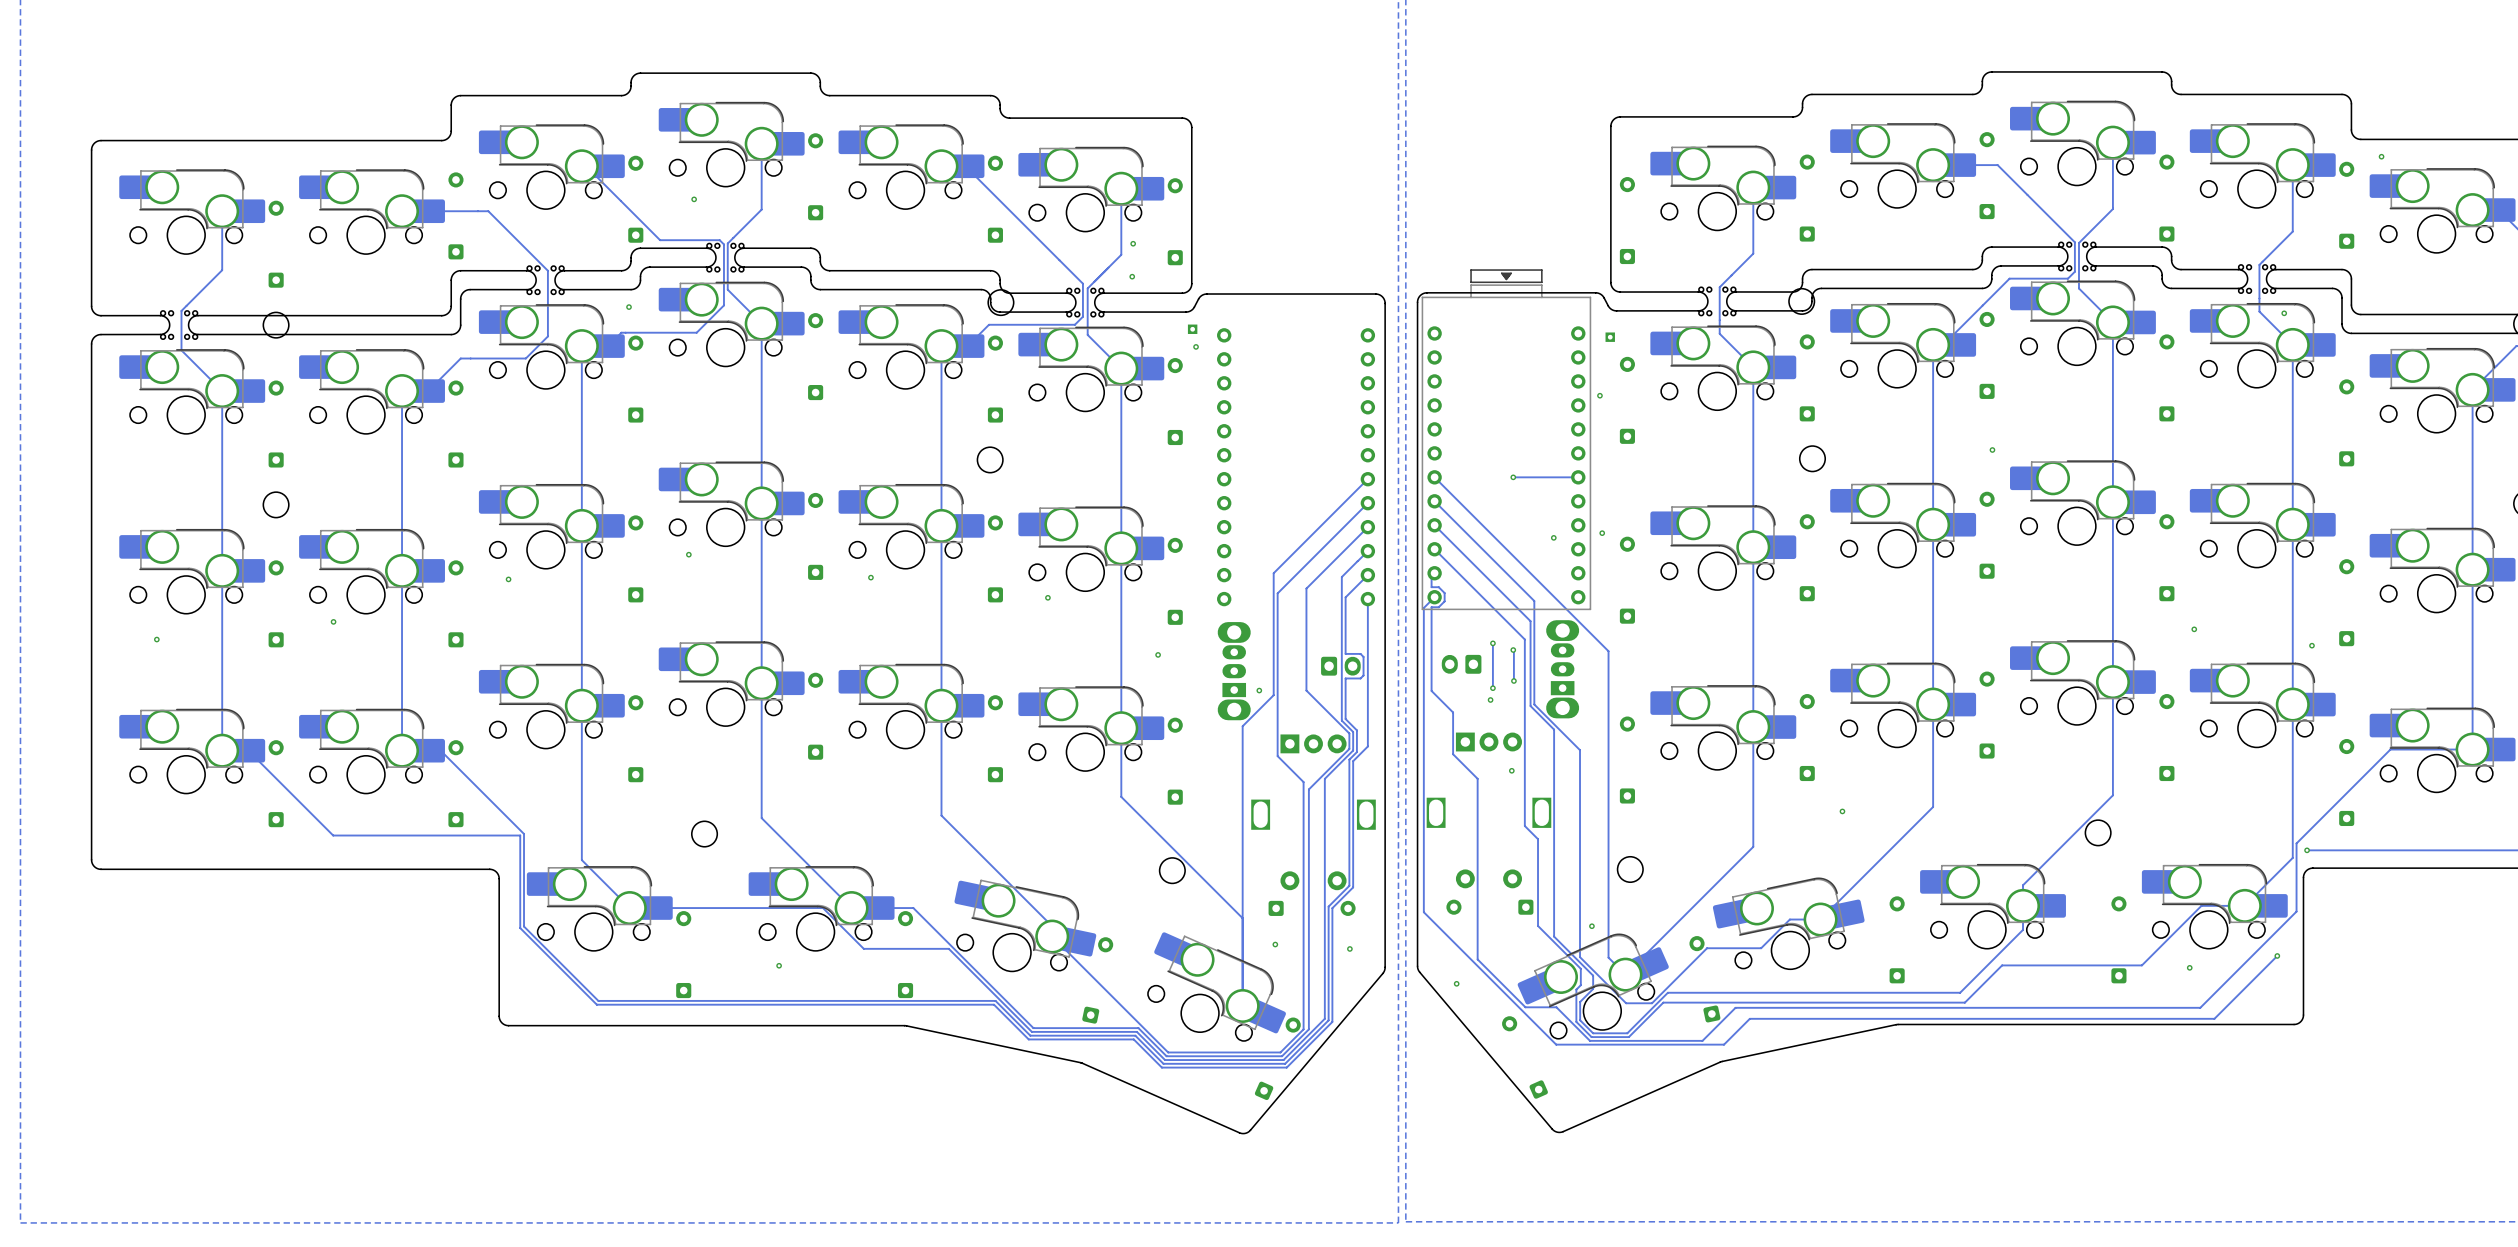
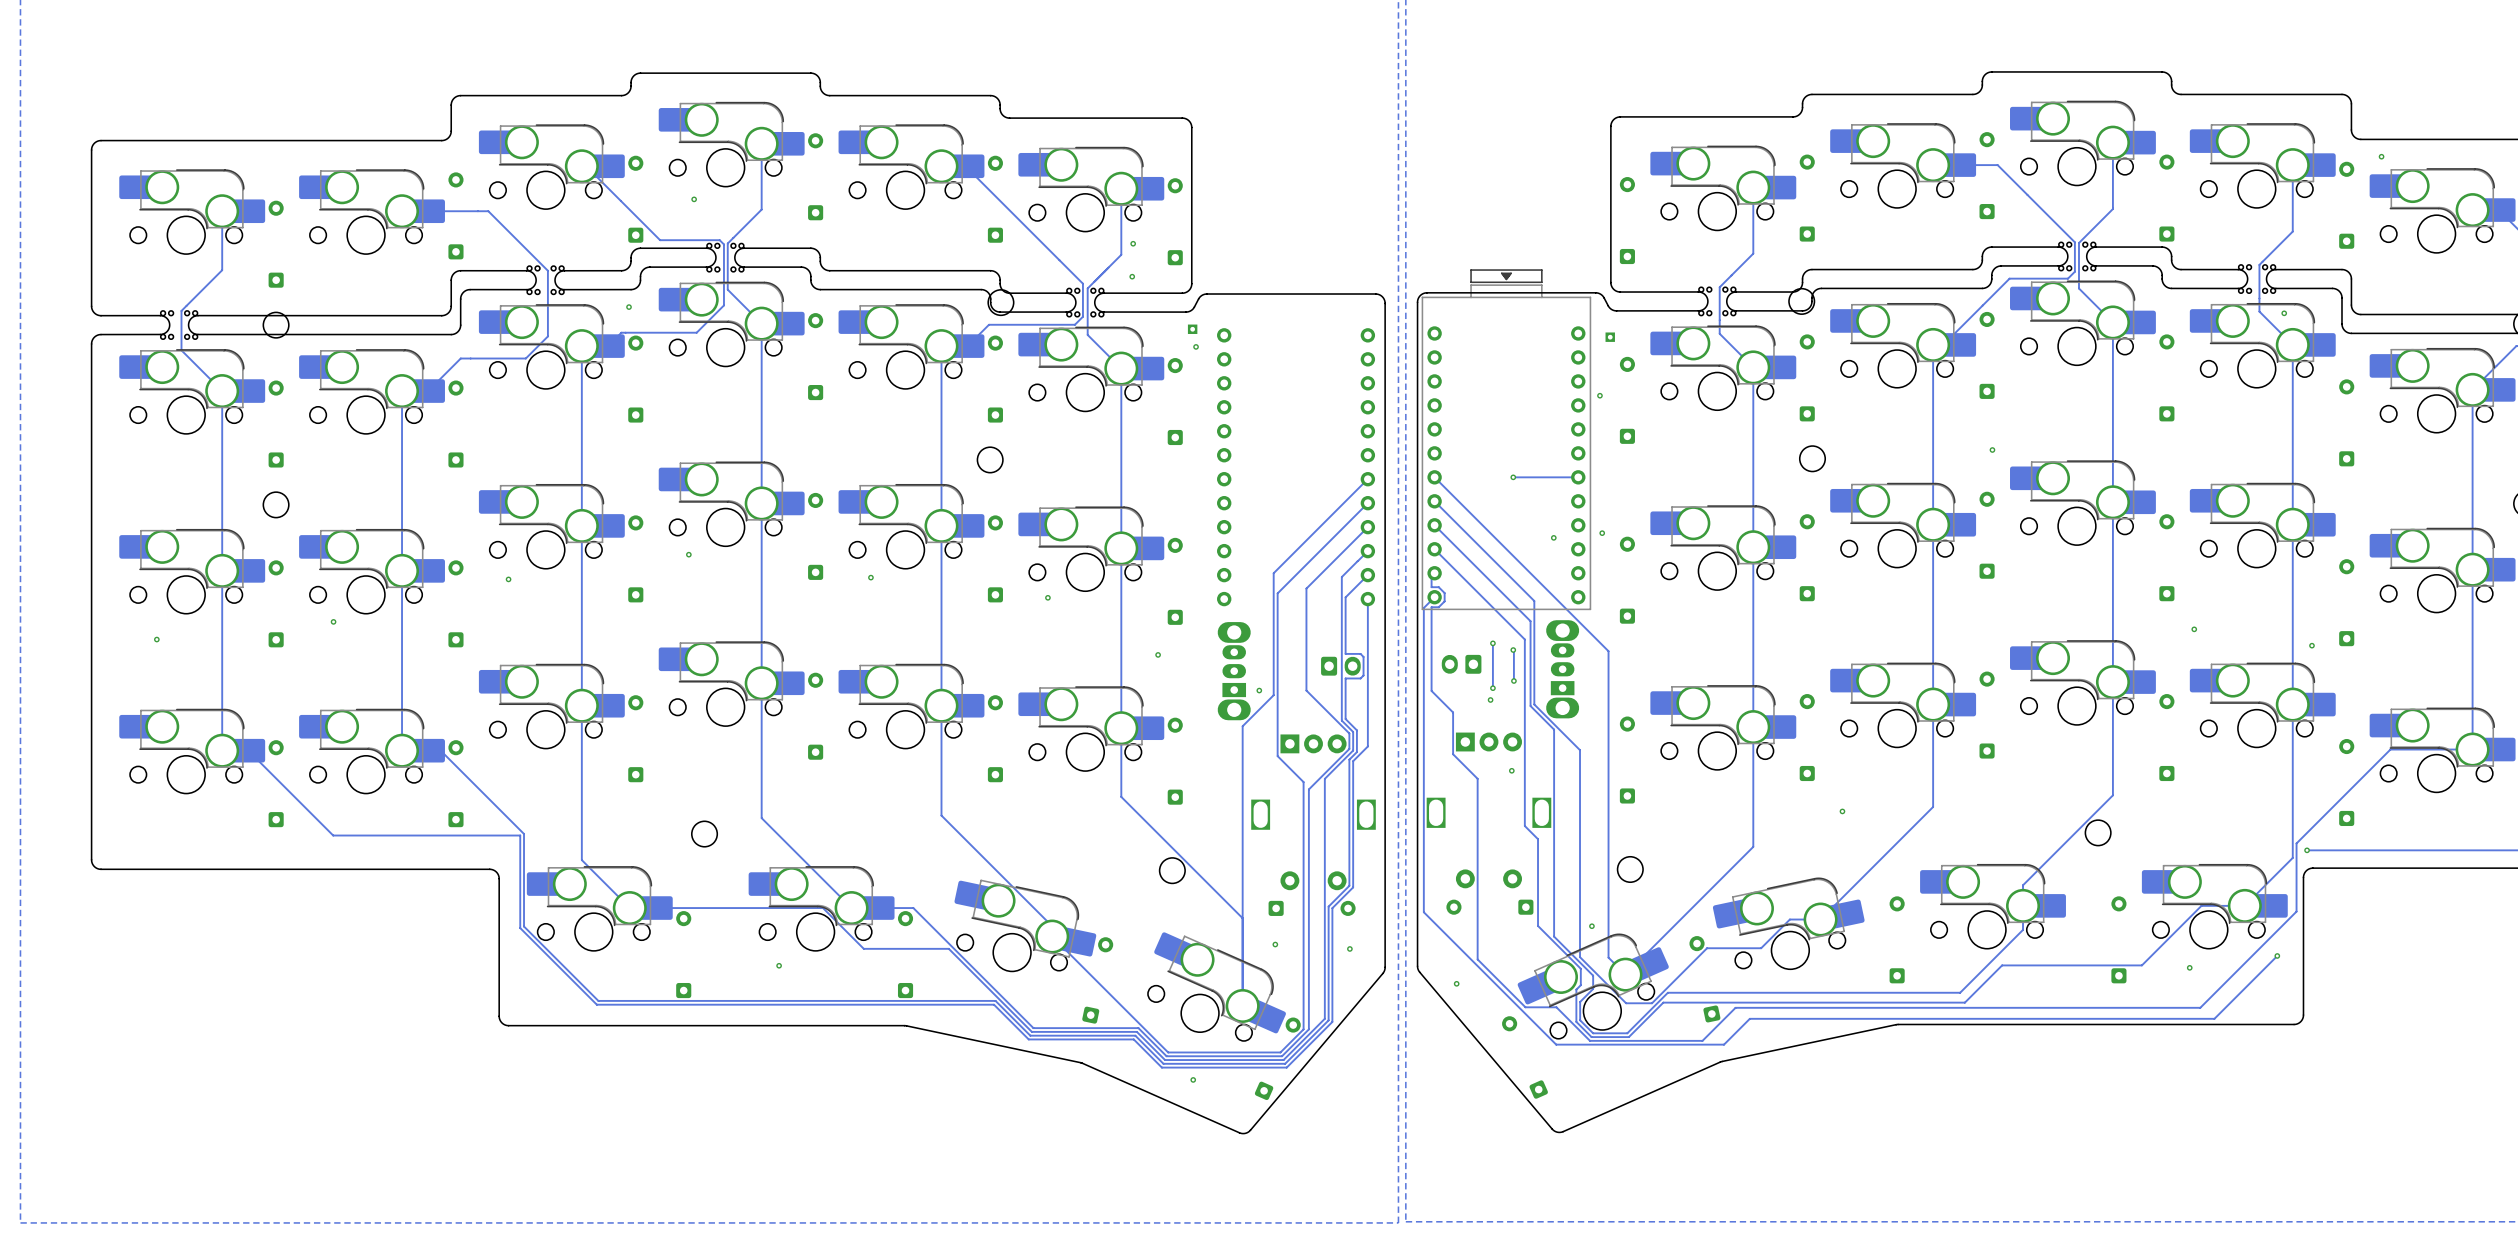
via: none -> (1193, 1079)

